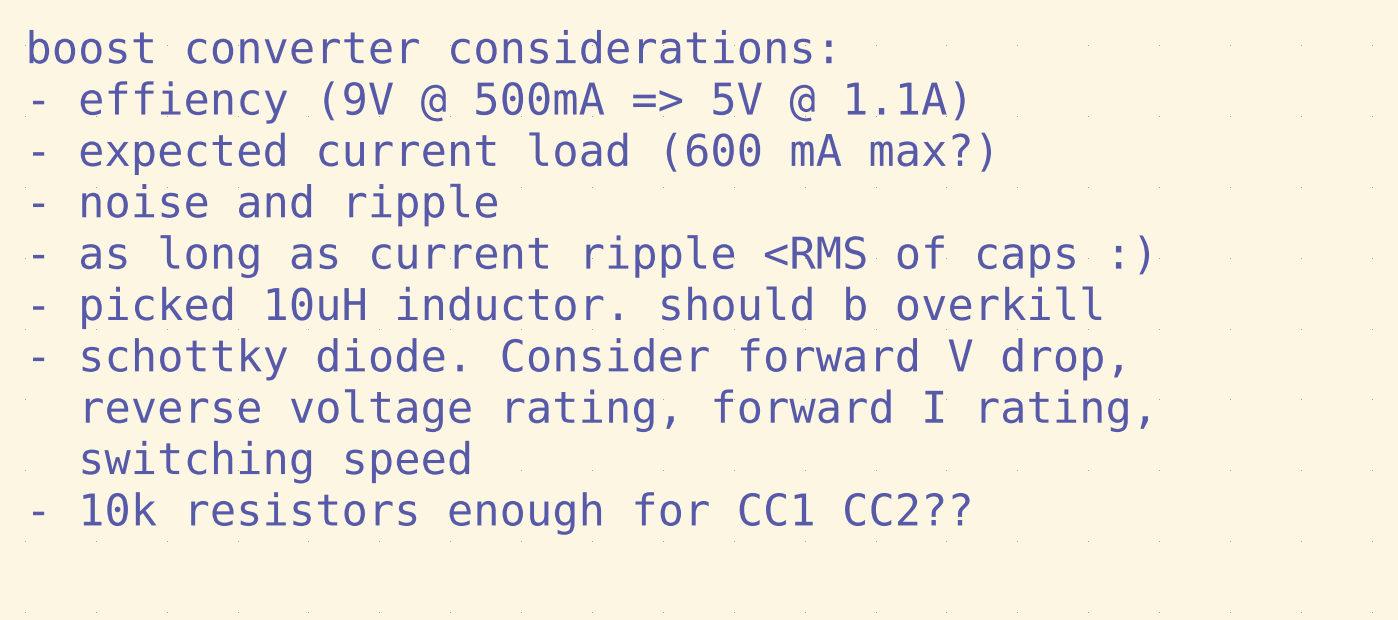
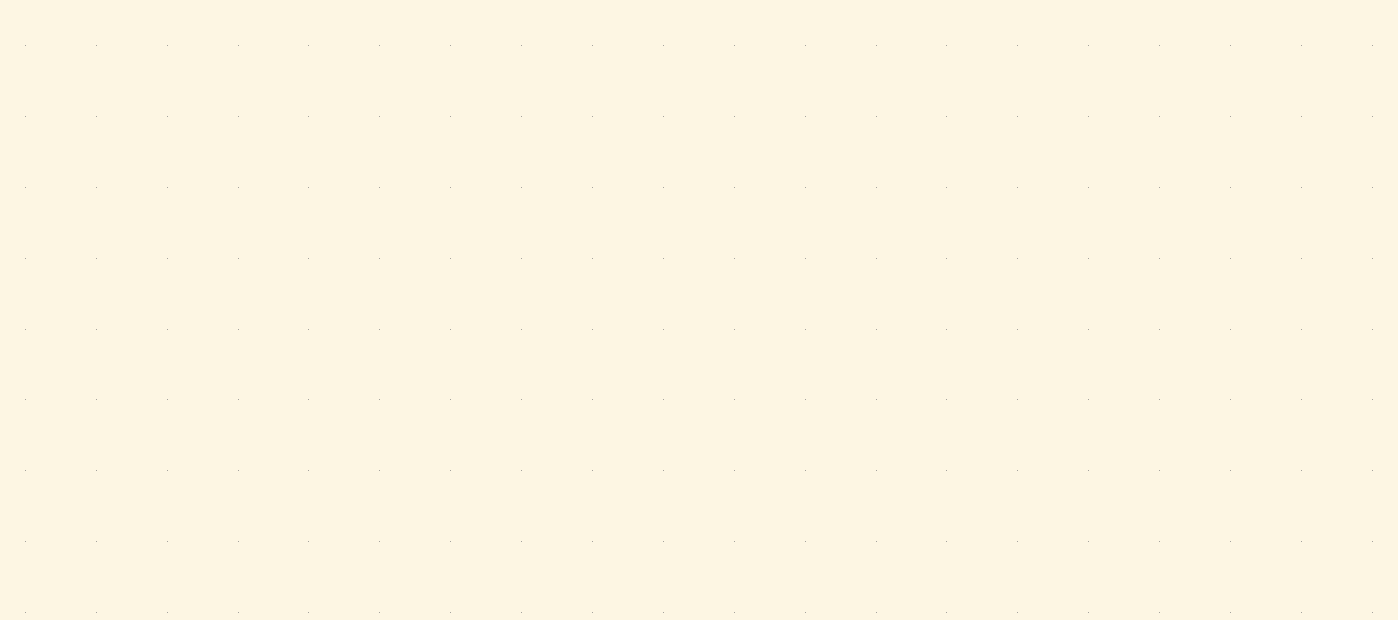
text: boost converter considerations: (430, 46) -> none
text: - effiency (9V @ 500mA => 5V @ 1.1A) (498, 102) -> none
text: - expected current load (600 mA max?) (512, 153) -> none
text: - noise and ripple (265, 205) -> none
text: - as long as current ripple <RMS of caps :) (591, 256) -> none
text: - picked 10uH inductor. should b overkill (567, 307) -> none
text: - schottky diode. Consider forward V drop, (577, 359) -> none
text: reverse voltage rating, forward I rating, (616, 410) -> none
text: switching speed (275, 462) -> none
text: - 10k resistors enough for CC1 CC2?? (501, 513) -> none

